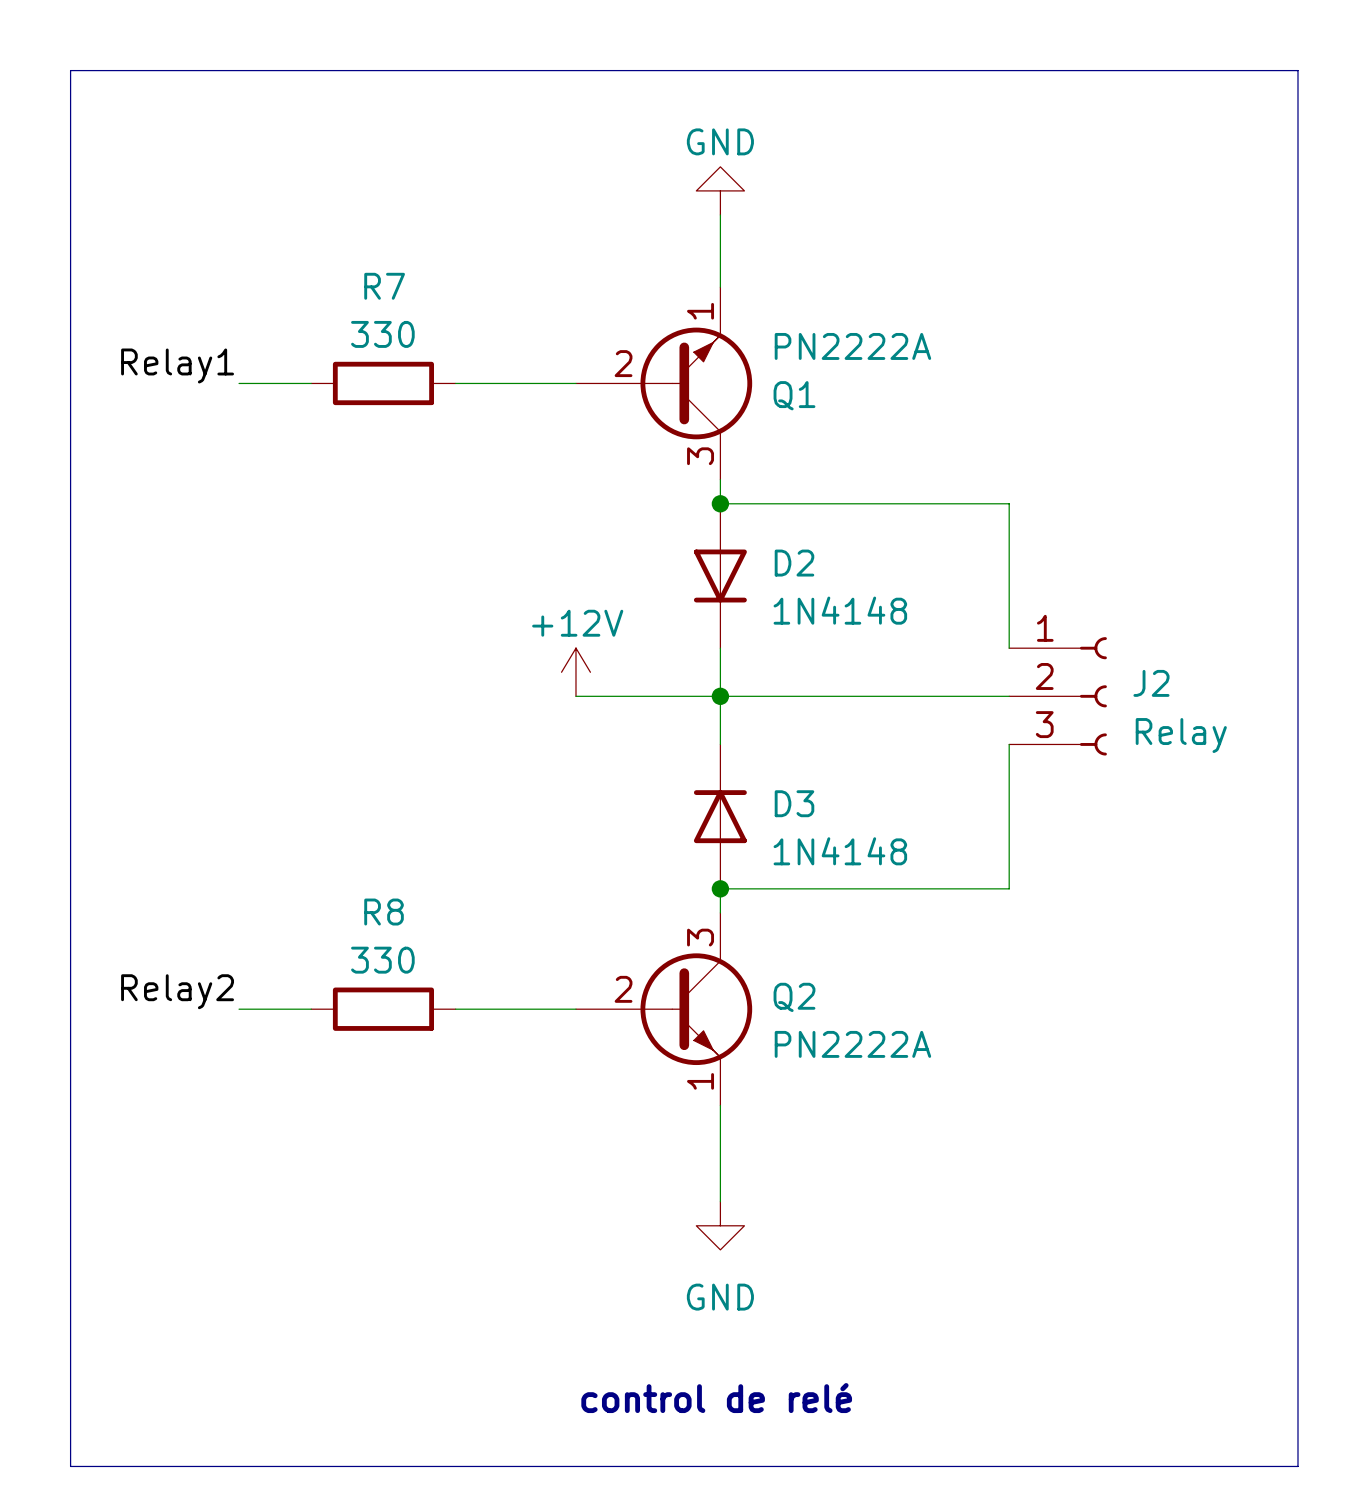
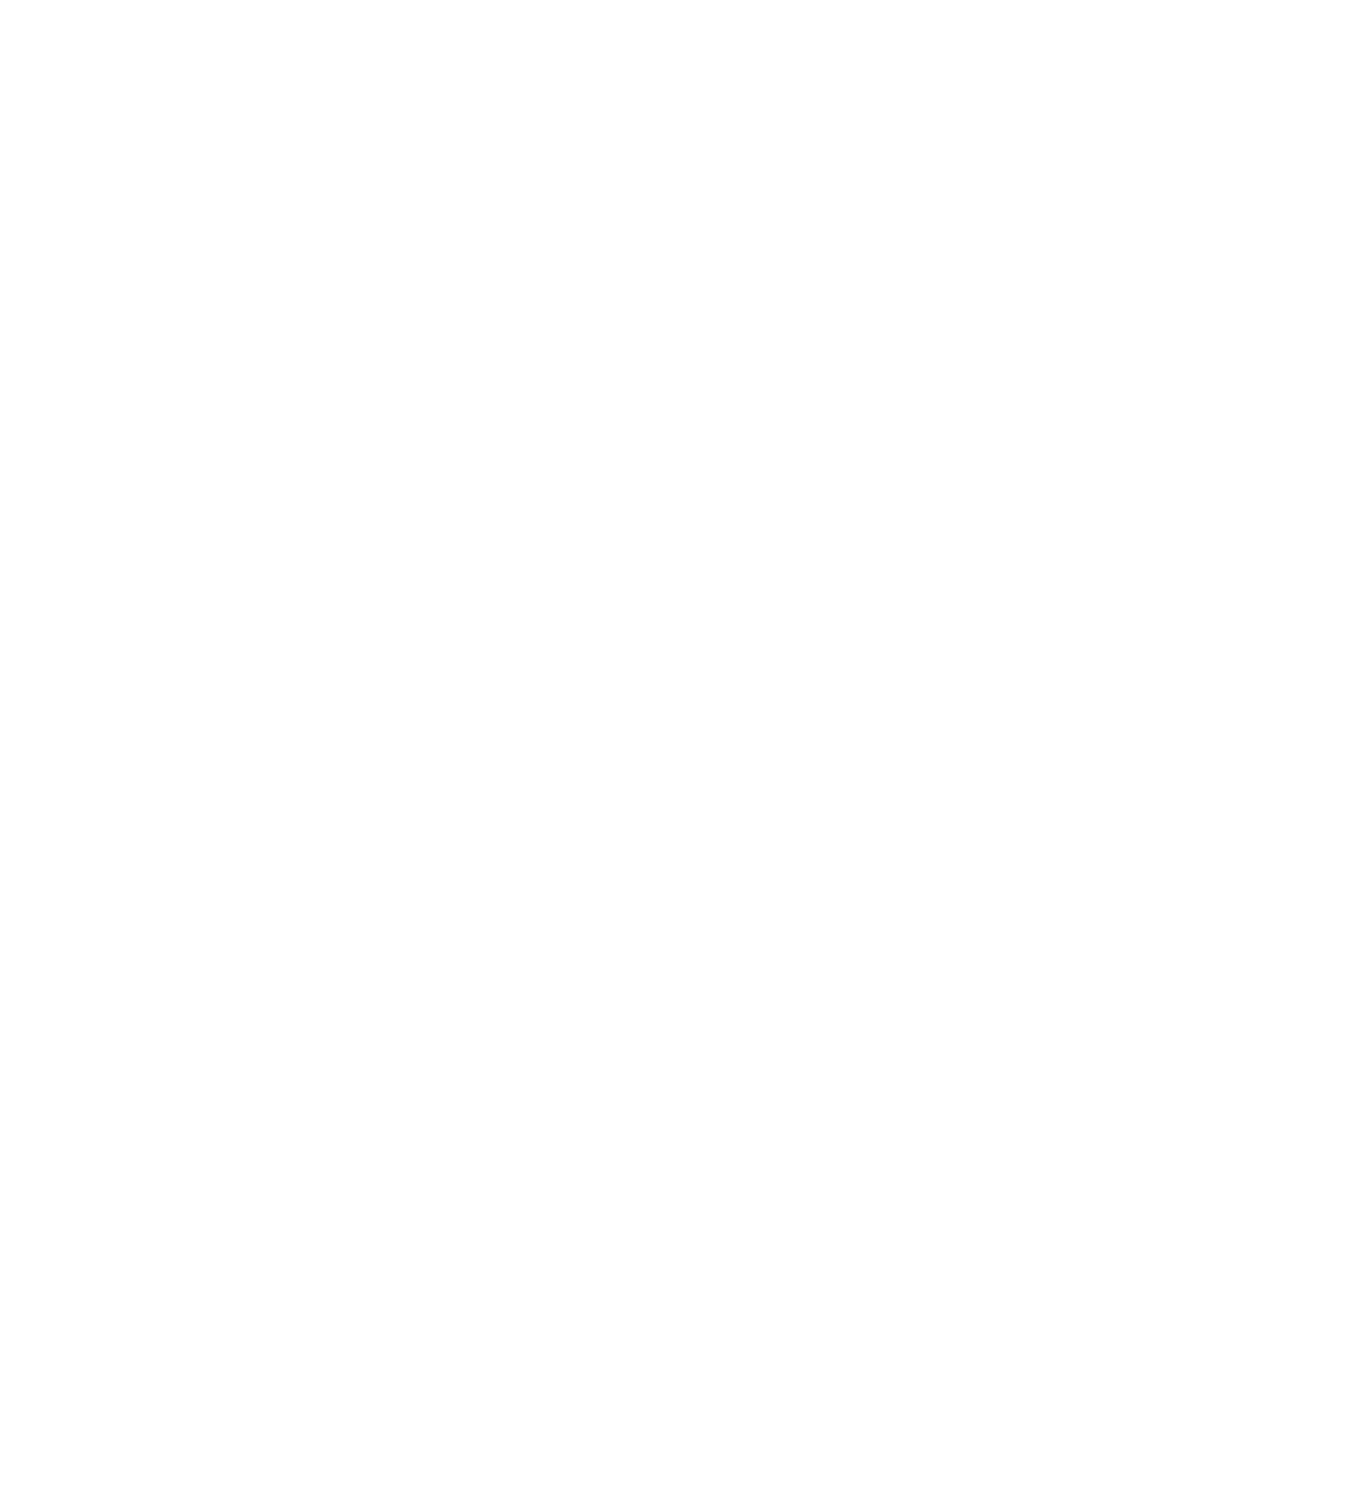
line: (70, 70) (1297, 70) (1297, 1466) (70, 1466) (70, 70) -> none
power symbol: GND (720, 190) -> none
wire: (720, 214) (720, 287) -> none
label: Relay1 (177, 365) -> none
wire: (239, 383) (311, 383) -> none
R7: 330 (383, 383) -> none
wire: (455, 383) (575, 383) -> none
Q1: PN2222A (664, 383) -> none
wire: (720, 479) (720, 503) (1009, 503) (1009, 648) -> none
junction: (720, 503) -> none
D2: 1N4148 (720, 575) -> none
wire: (720, 648) (720, 744) -> none
power symbol: +12V (575, 672) -> none
wire: (575, 696) (1009, 696) -> none
junction: (720, 696) -> none
J2: Relay (1058, 696) -> none
wire: (1009, 744) (1009, 888) (720, 888) (720, 912) -> none
D3: 1N4148 (720, 816) -> none
junction: (720, 888) -> none
label: Relay2 (177, 991) -> none
wire: (239, 1009) (311, 1009) -> none
R8: 330 (383, 1009) -> none
wire: (455, 1009) (575, 1009) -> none
Q2: PN2222A (664, 1009) -> none
wire: (720, 1105) (720, 1201) -> none
power symbol: GND (720, 1225) -> none
text: control de relé (716, 1398) -> none

